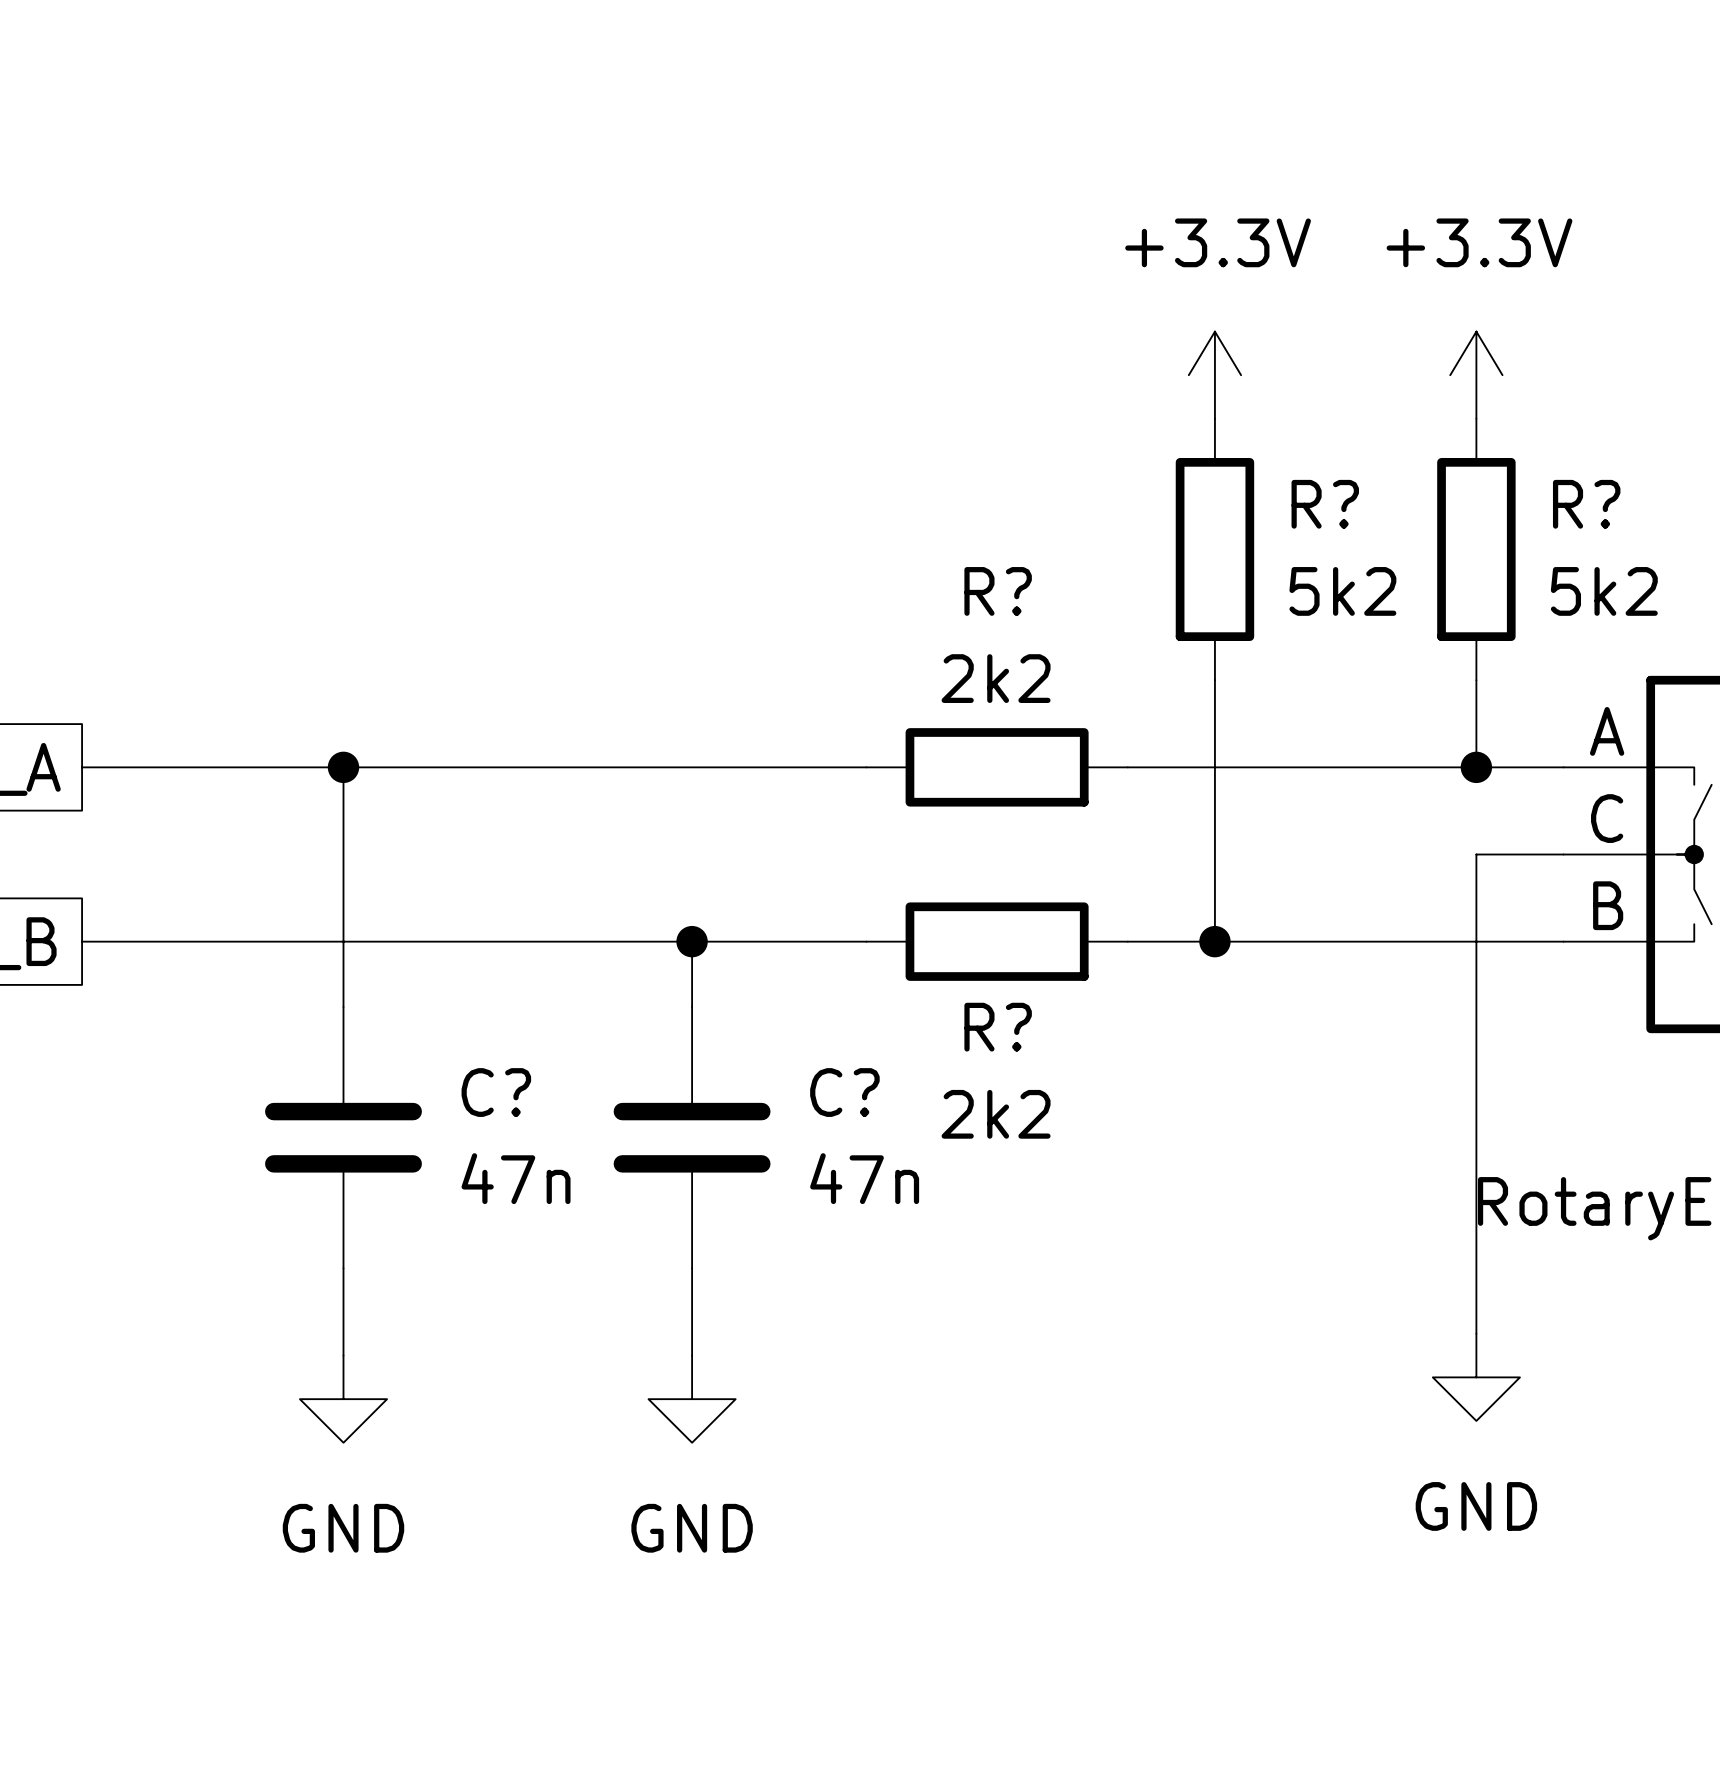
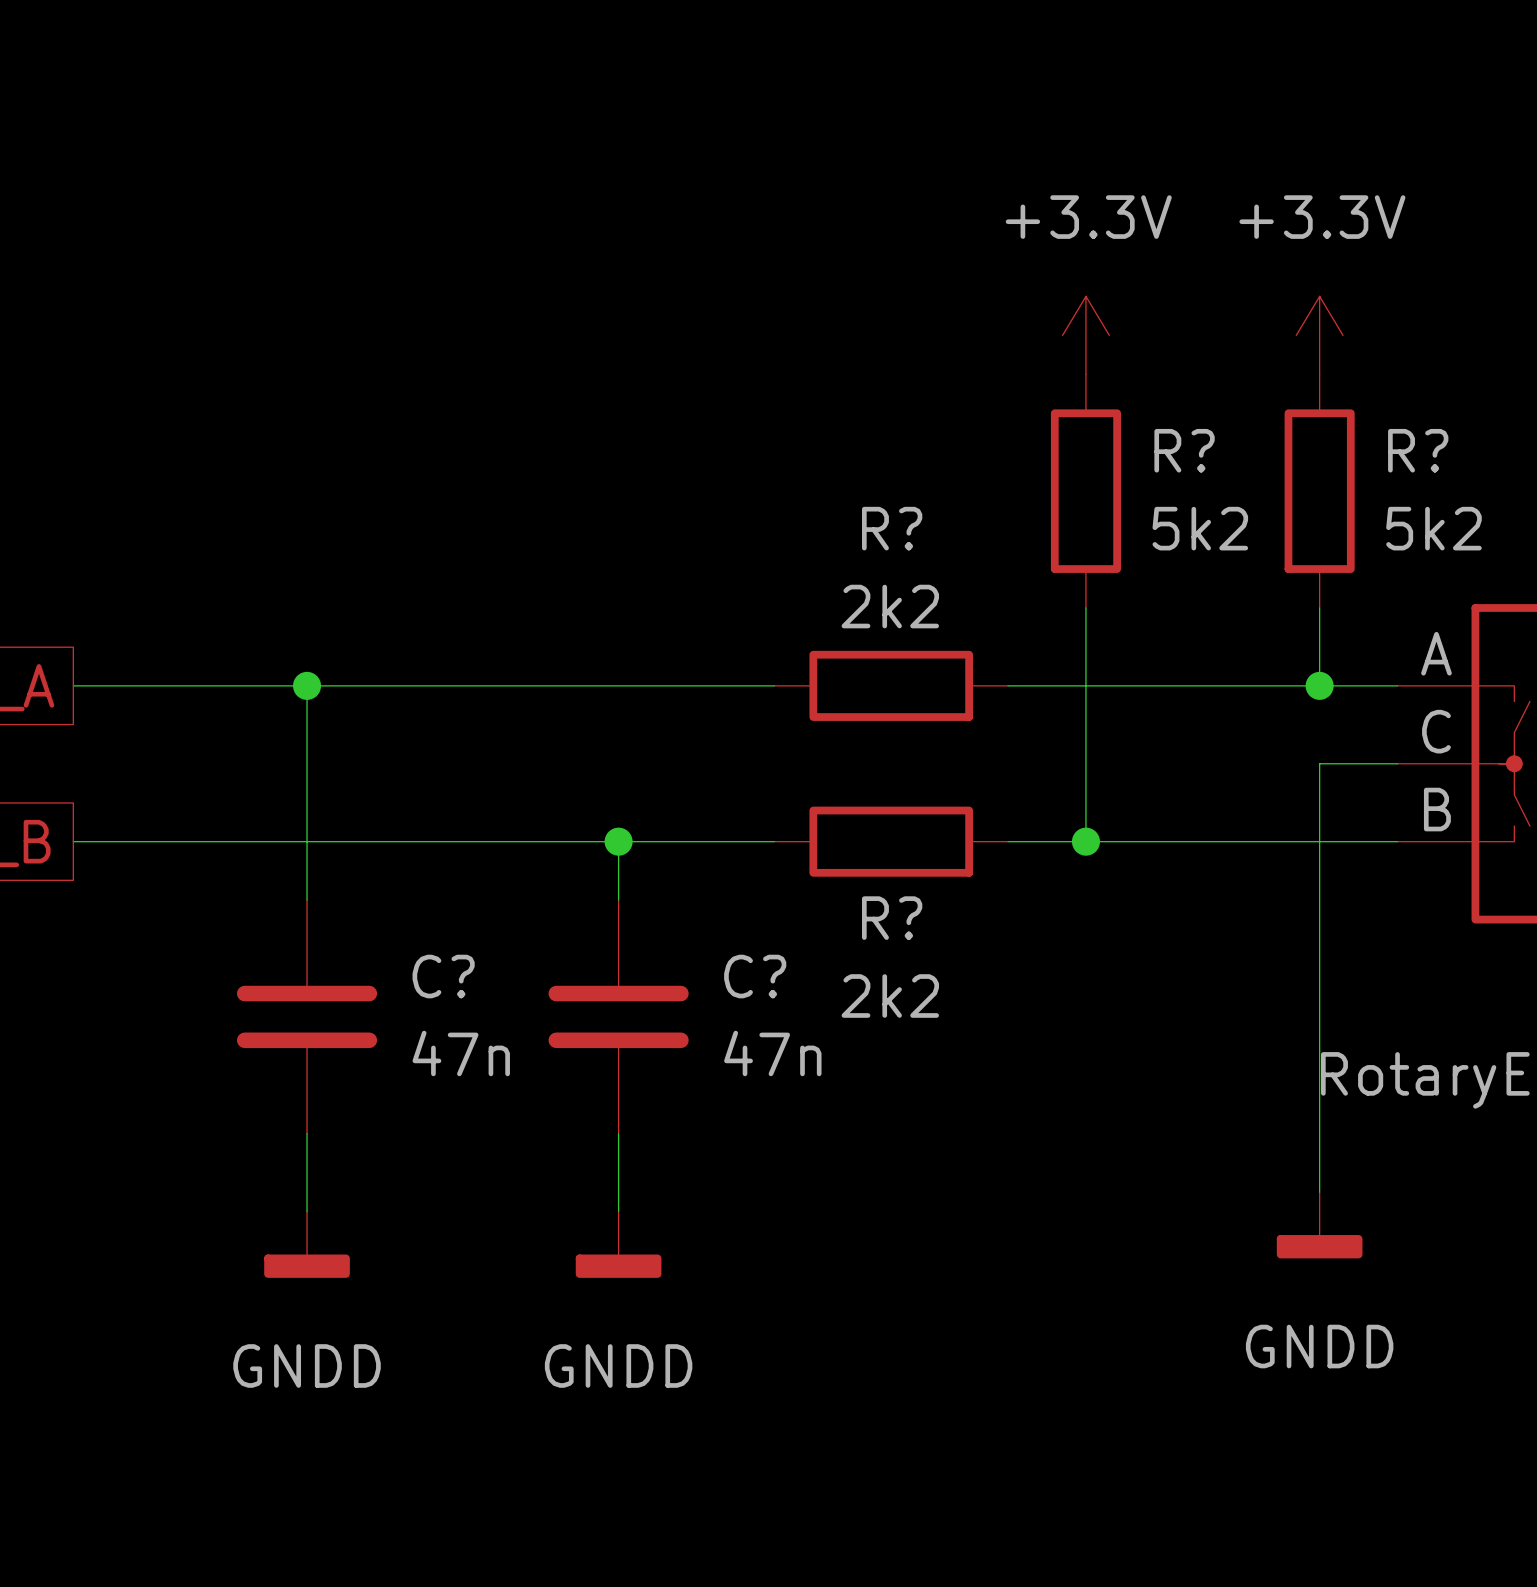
power symbol: GND (1476, 1377) -> GNDD (1319, 1225)
power symbol: GND (343, 1399) -> GNDD (307, 1244)
power symbol: GND (692, 1399) -> GNDD (618, 1244)

